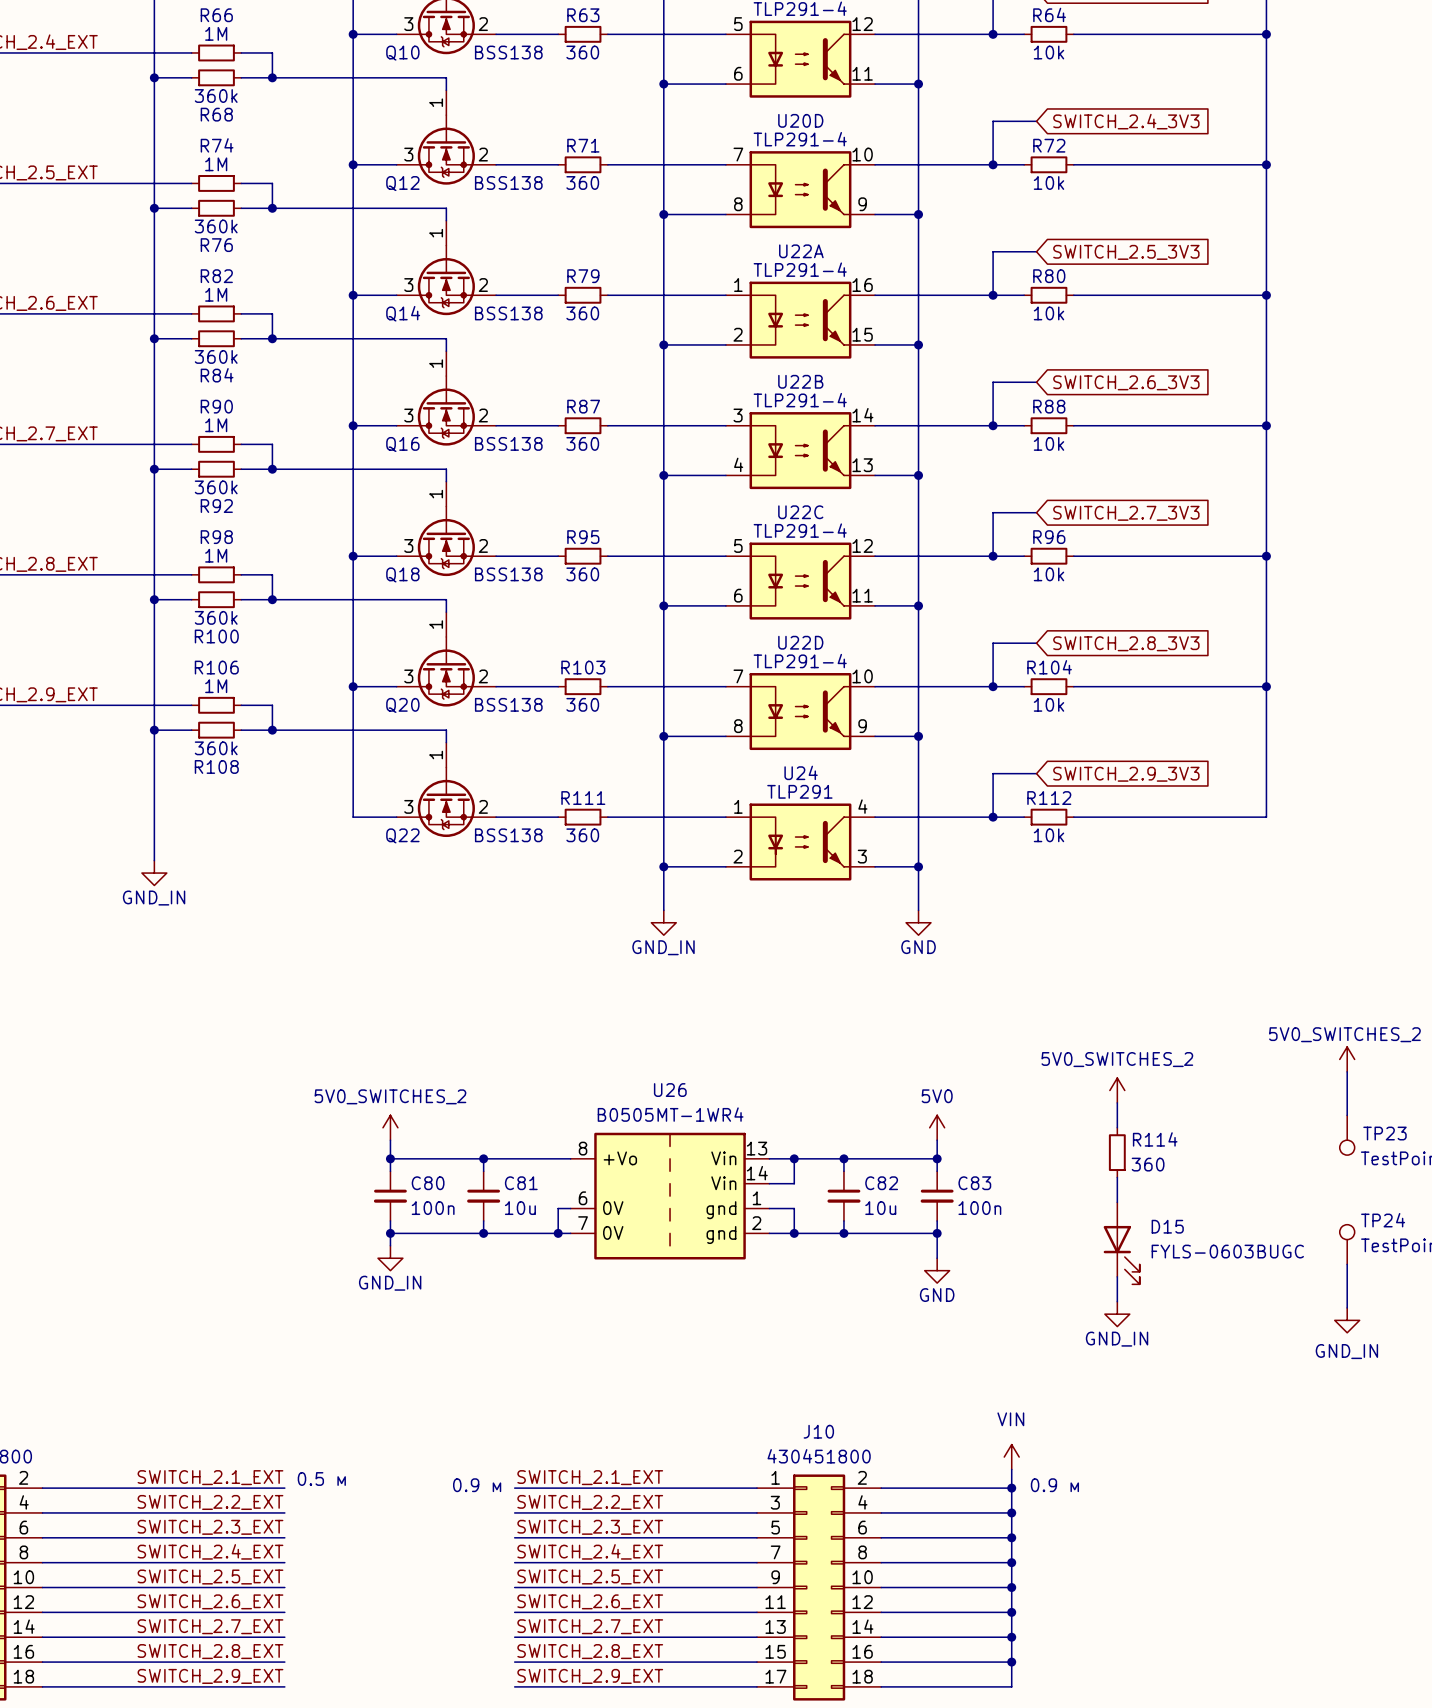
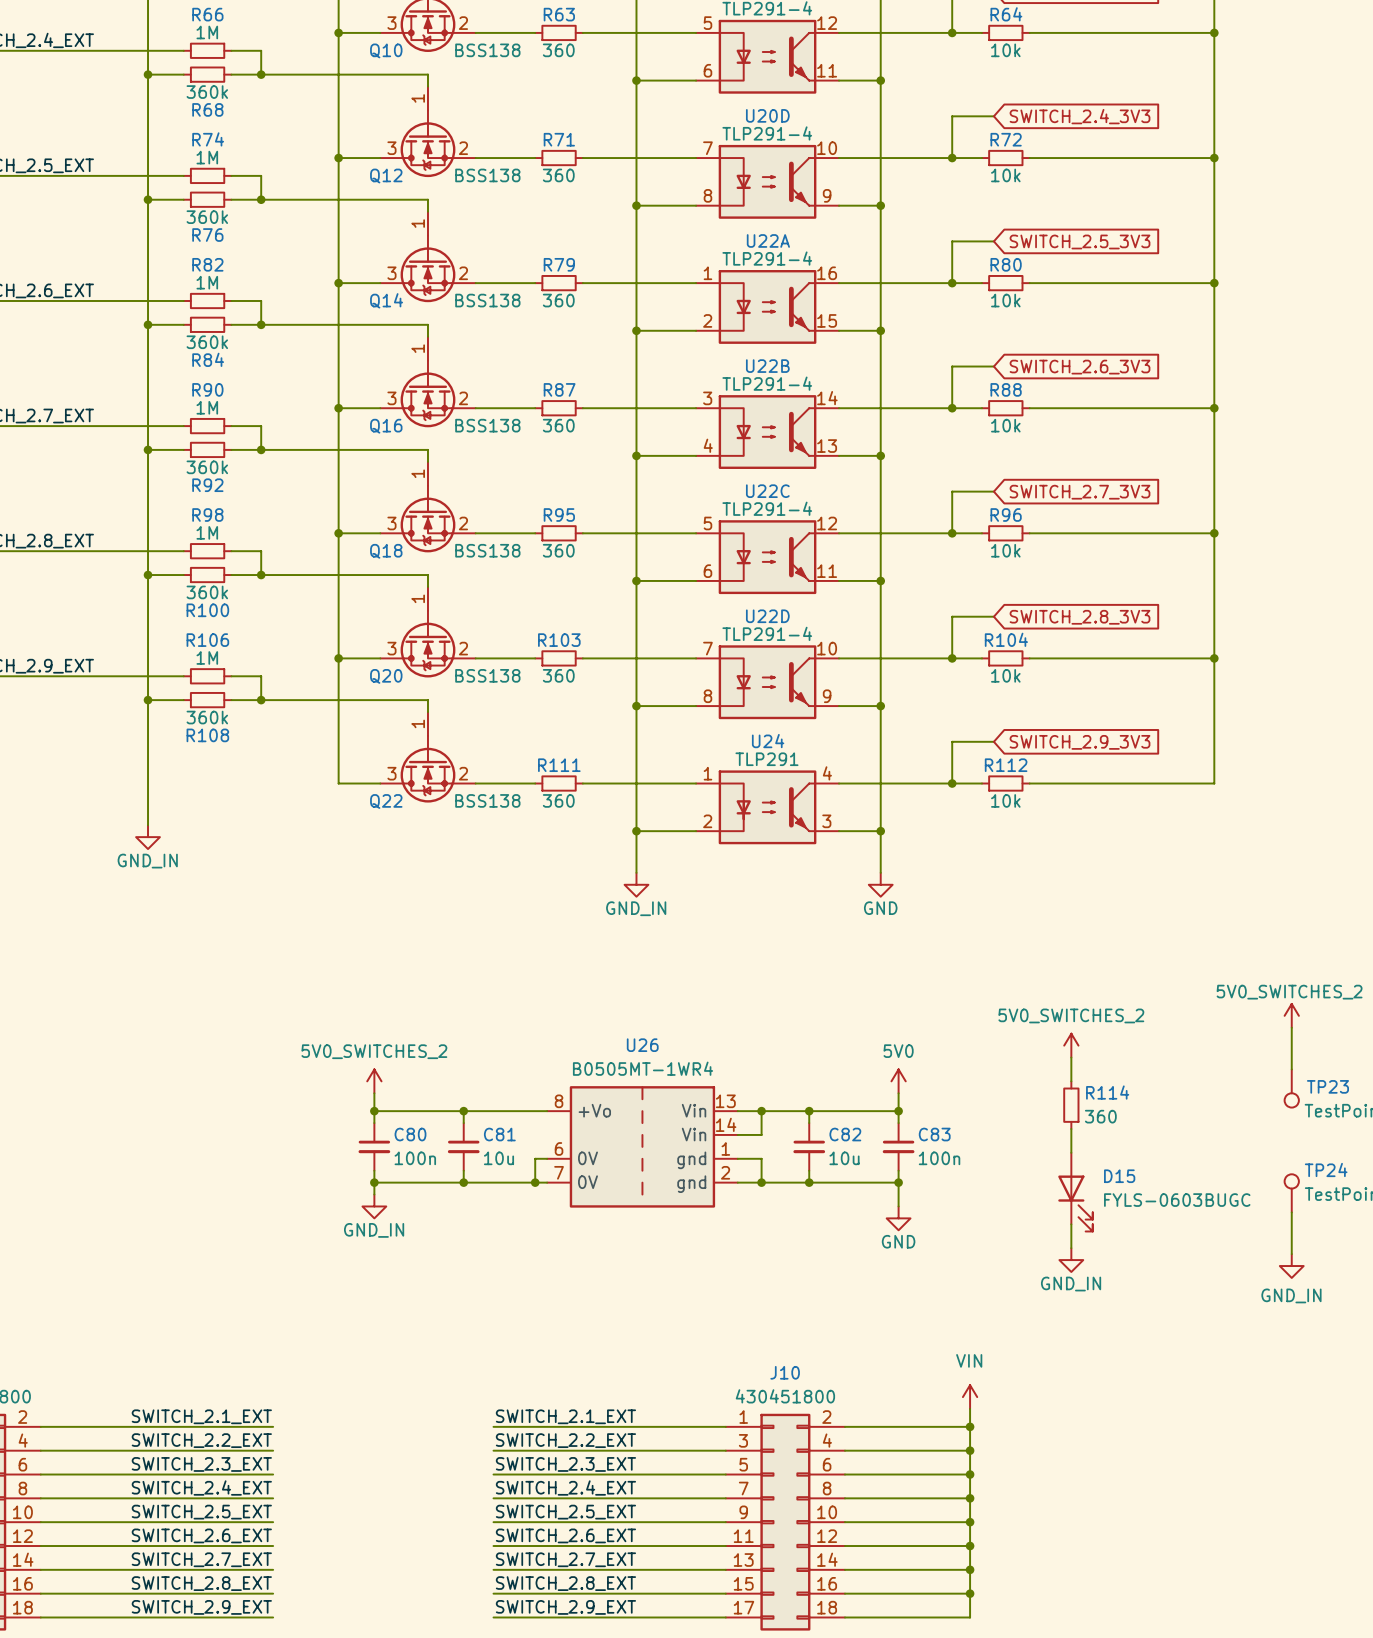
text: 0.5 м (321, 1478) -> none
text: 0.9 м (477, 1485) -> none
text: 0.9 м (1054, 1485) -> none

